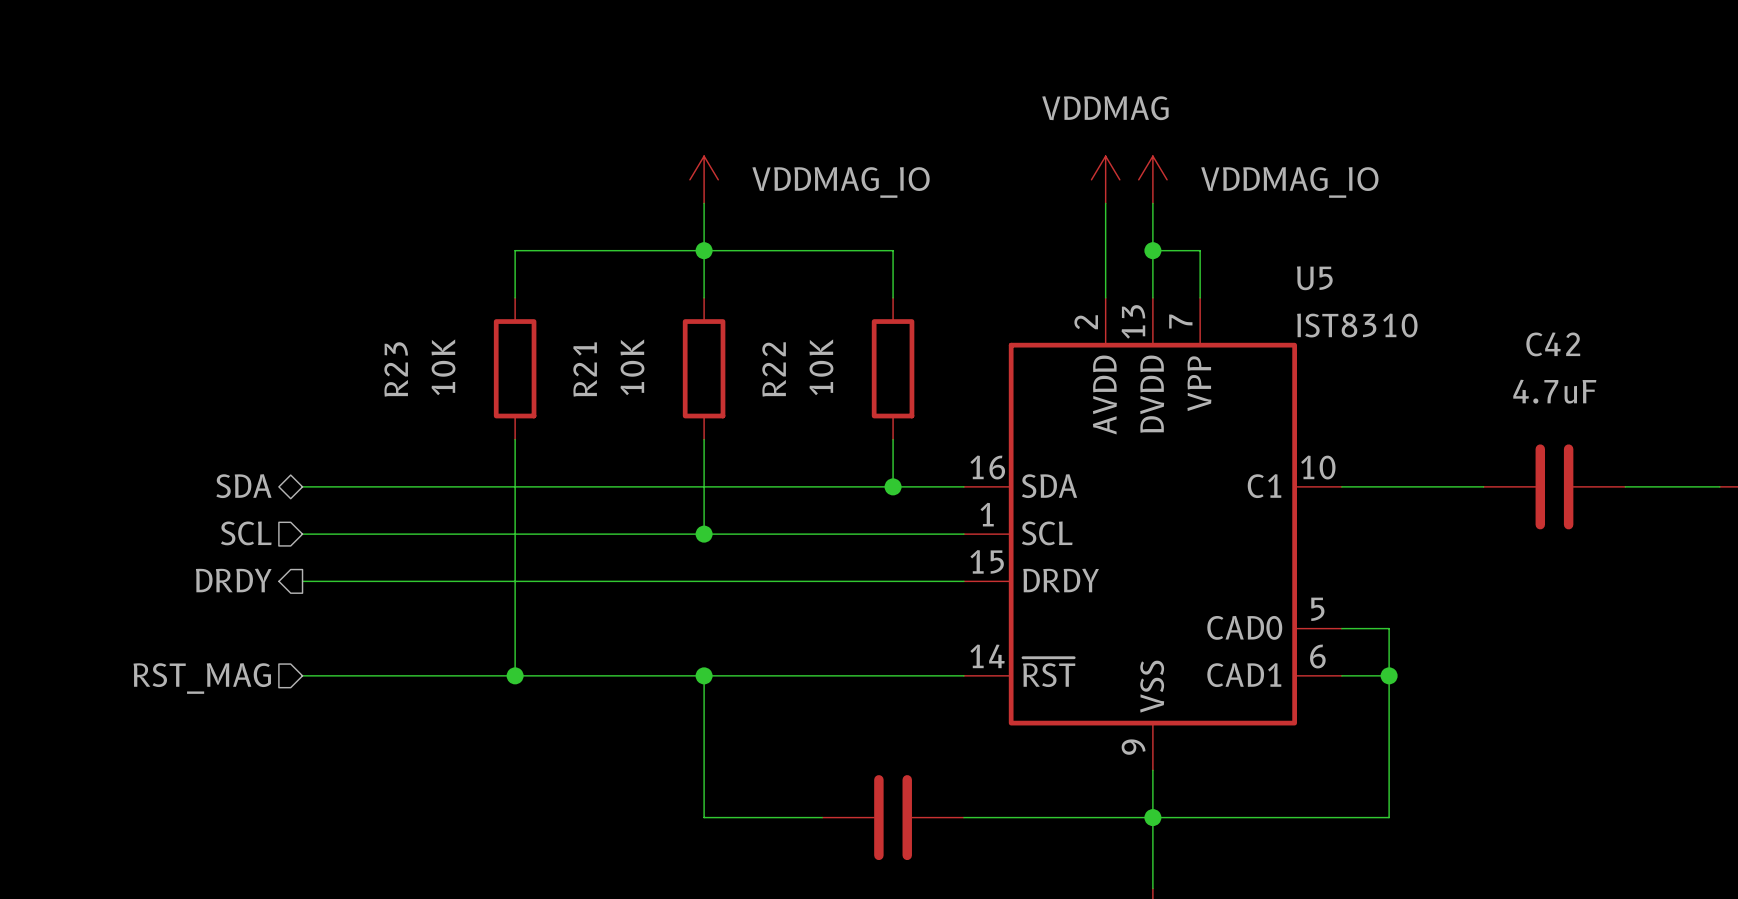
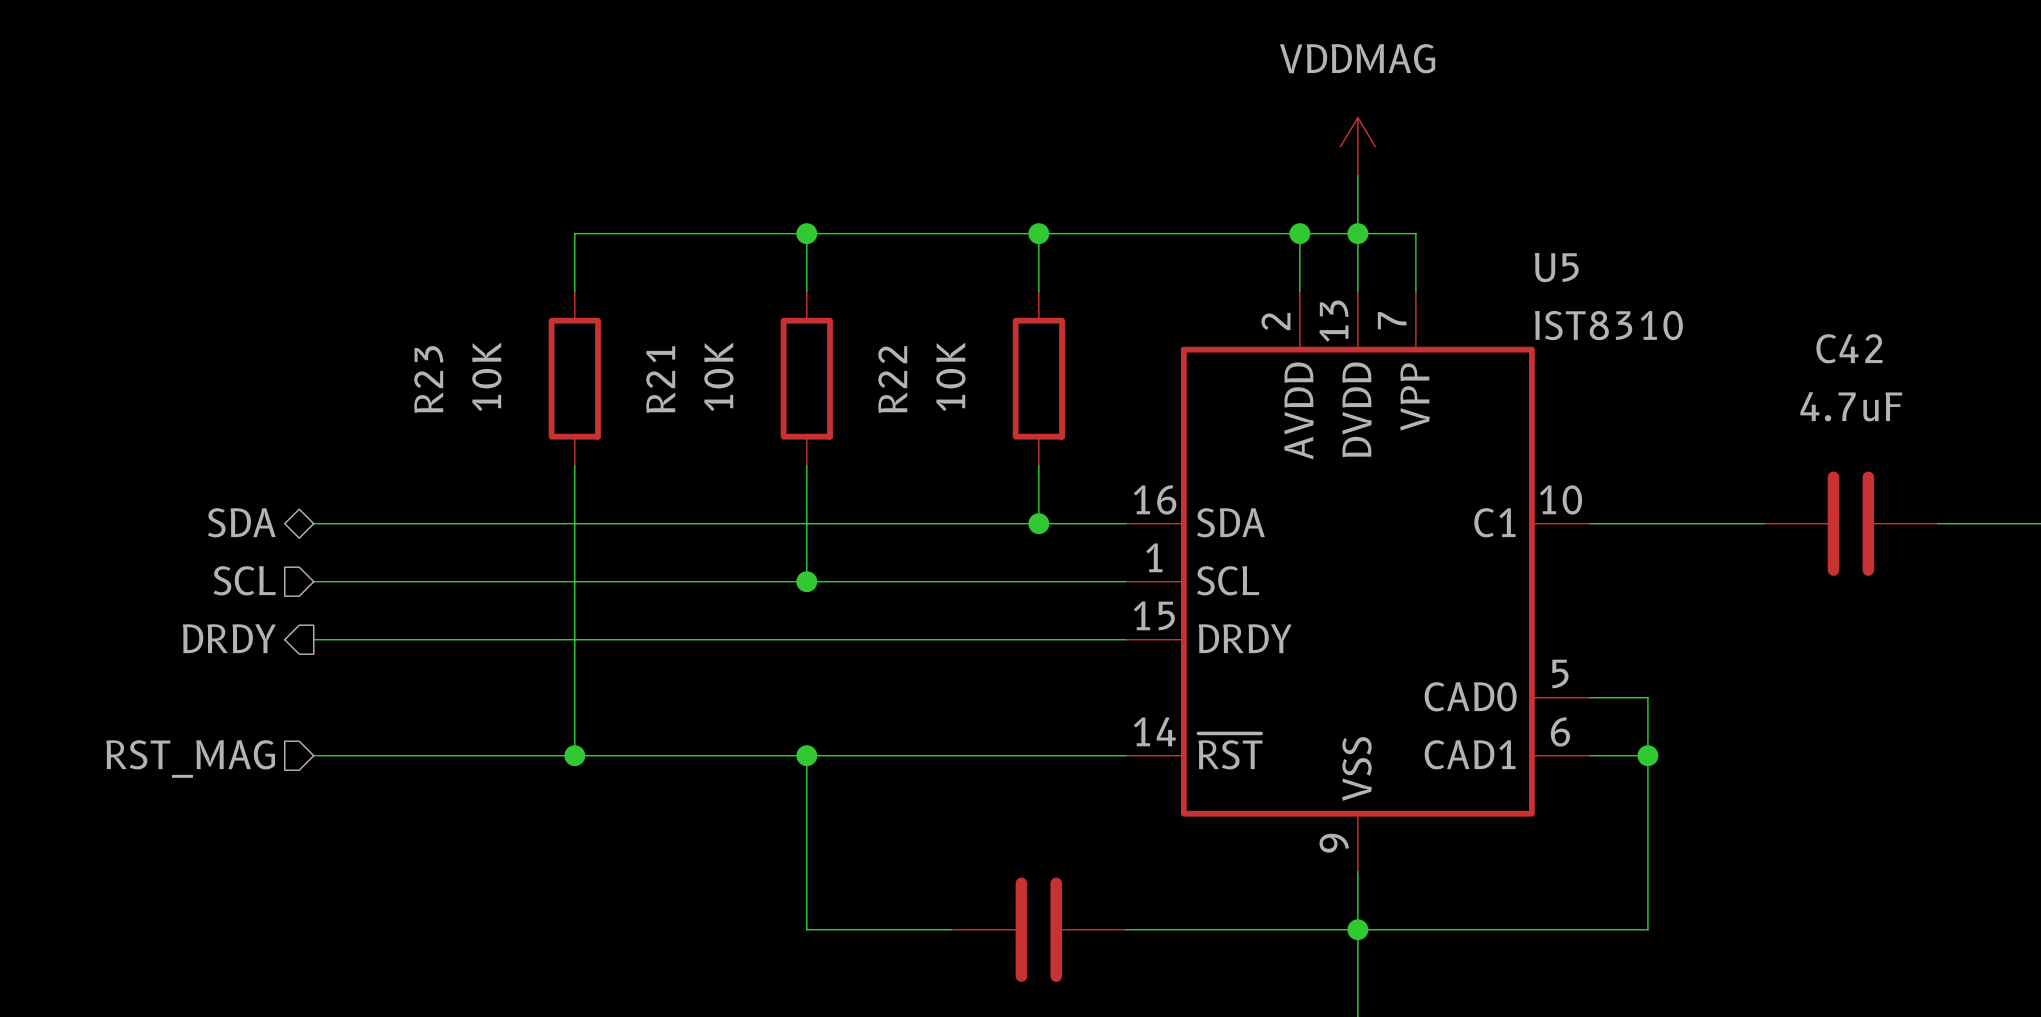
power symbol: VDDMAG_IO (704, 179) -> none
power symbol: VDDMAG (1105, 179) -> none
power symbol: VDDMAG_IO (1152, 179) -> VDDMAG (1357, 146)
wire: (704, 203) (704, 250) -> none
wire: (1105, 203) (1105, 250) -> none
wire: none -> (1038, 233) (1357, 233)
junction: none -> (1038, 233)
junction: none -> (1299, 233)

